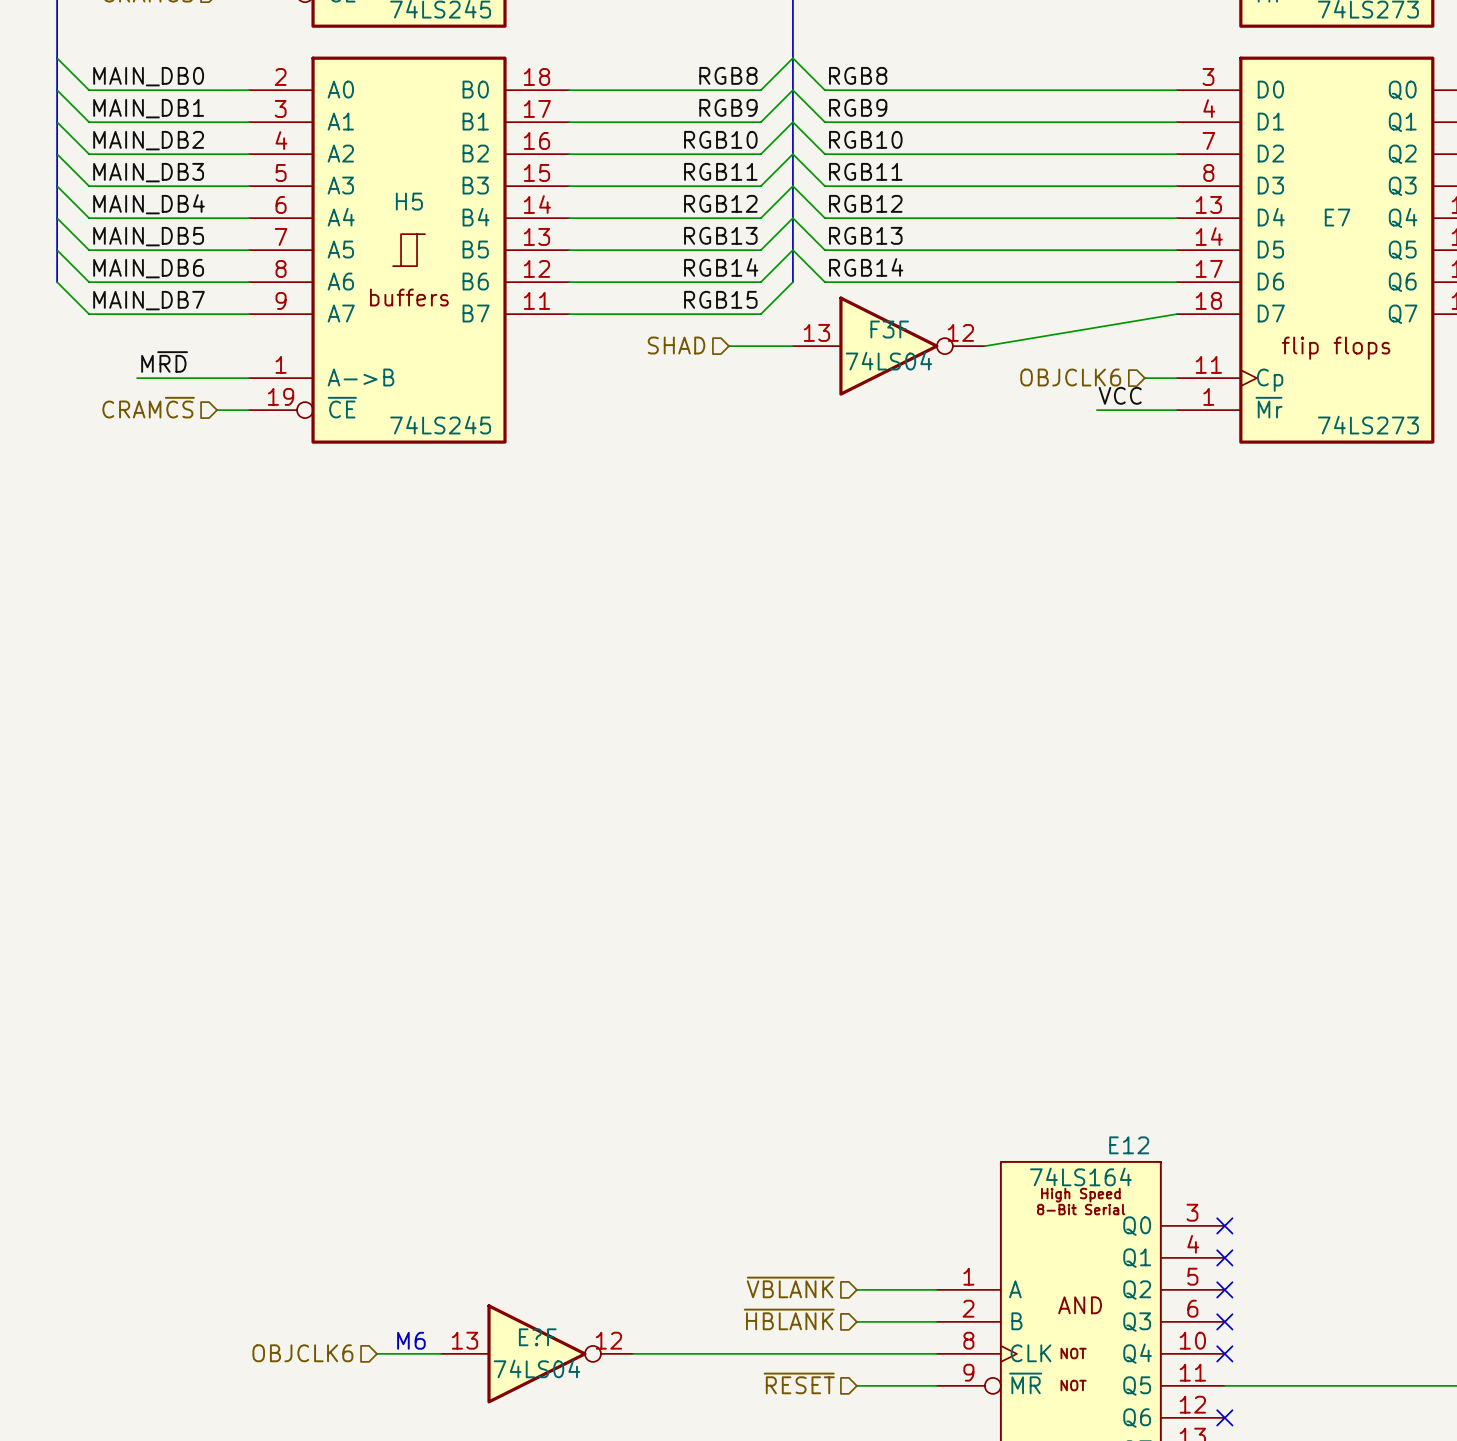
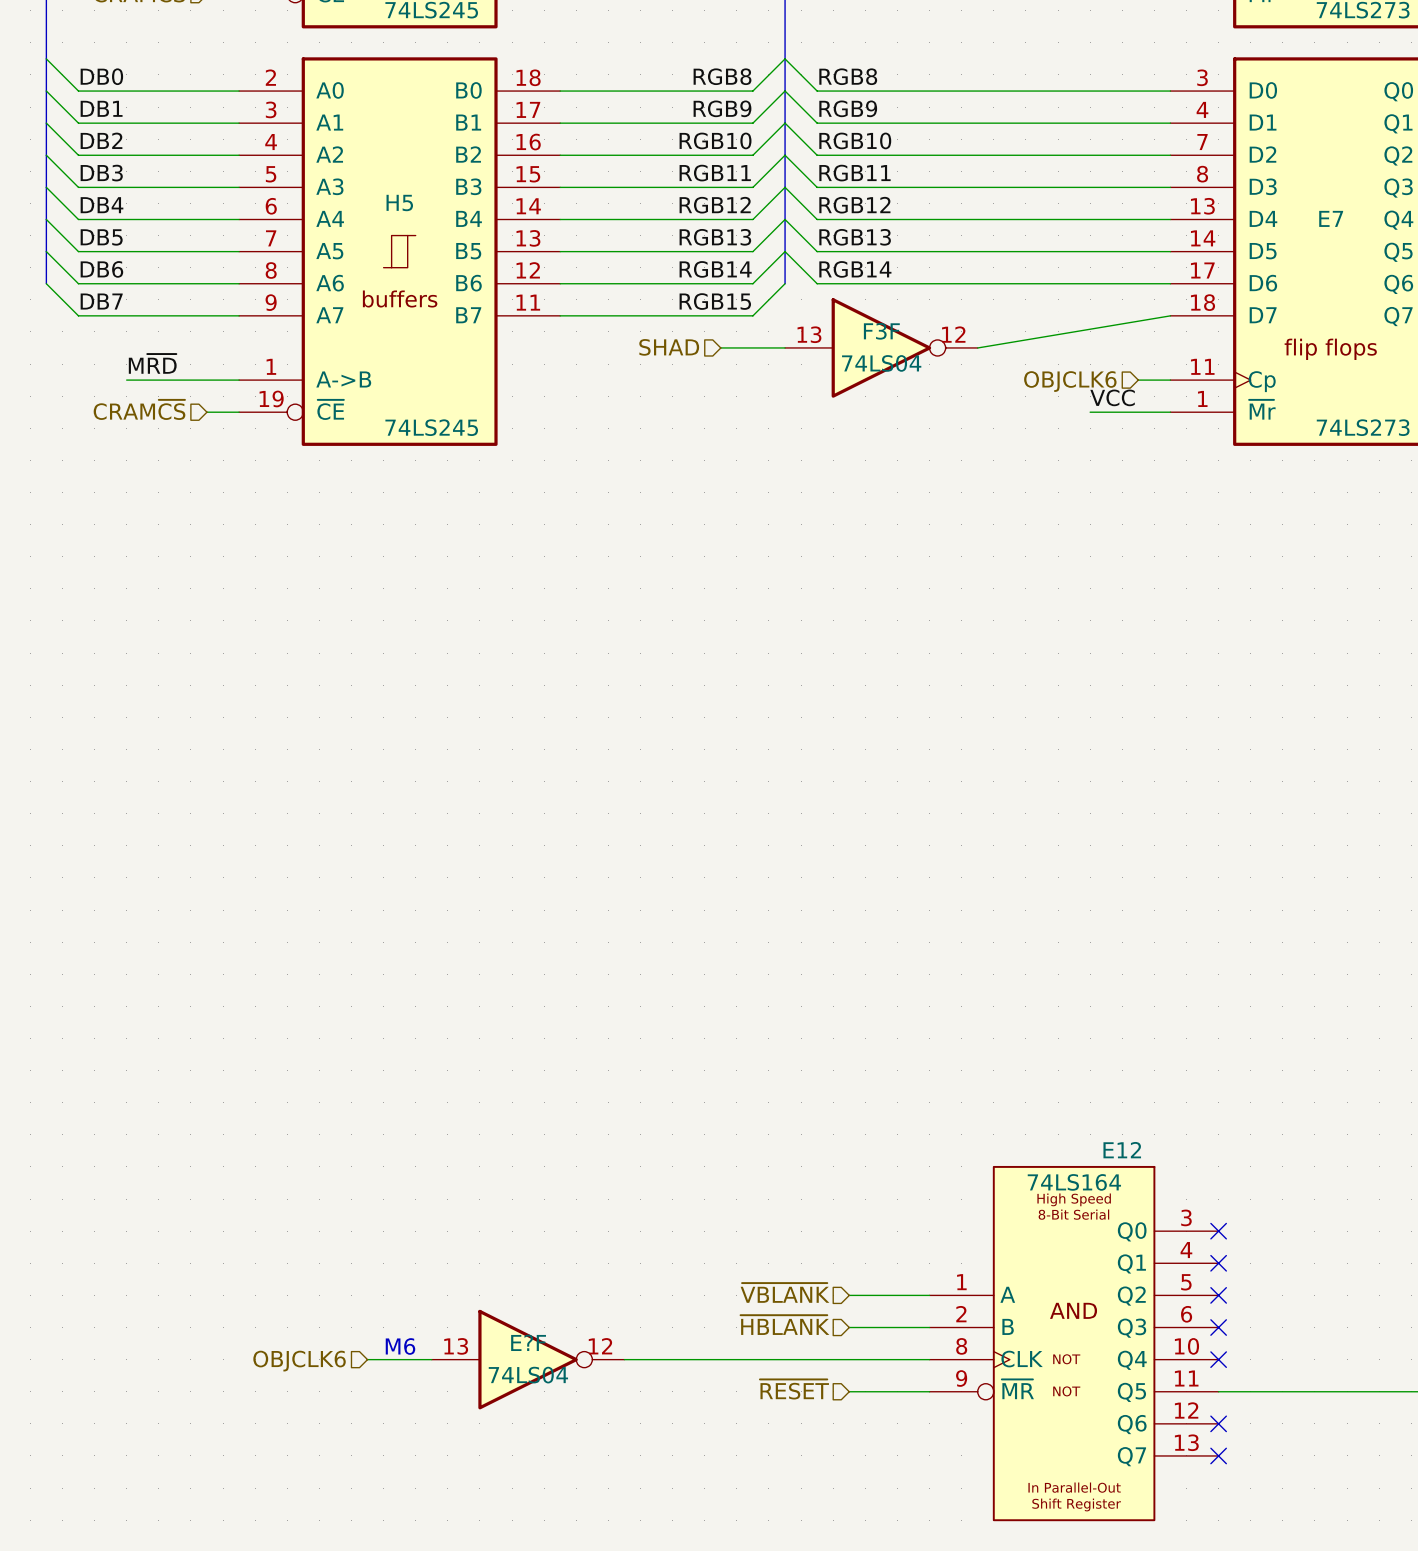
label: MAIN_DB0 (148, 76) -> DB0 (101, 76)
label: MAIN_DB1 (148, 108) -> DB1 (101, 108)
label: MAIN_DB2 (148, 140) -> DB2 (101, 140)
label: MAIN_DB3 (148, 172) -> DB3 (101, 173)
label: MAIN_DB4 (149, 204) -> DB4 (101, 205)
label: MAIN_DB5 (148, 236) -> DB5 (101, 237)
label: MAIN_DB6 (148, 268) -> DB6 (101, 269)
label: MAIN_DB7 (149, 300) -> DB7 (101, 301)

